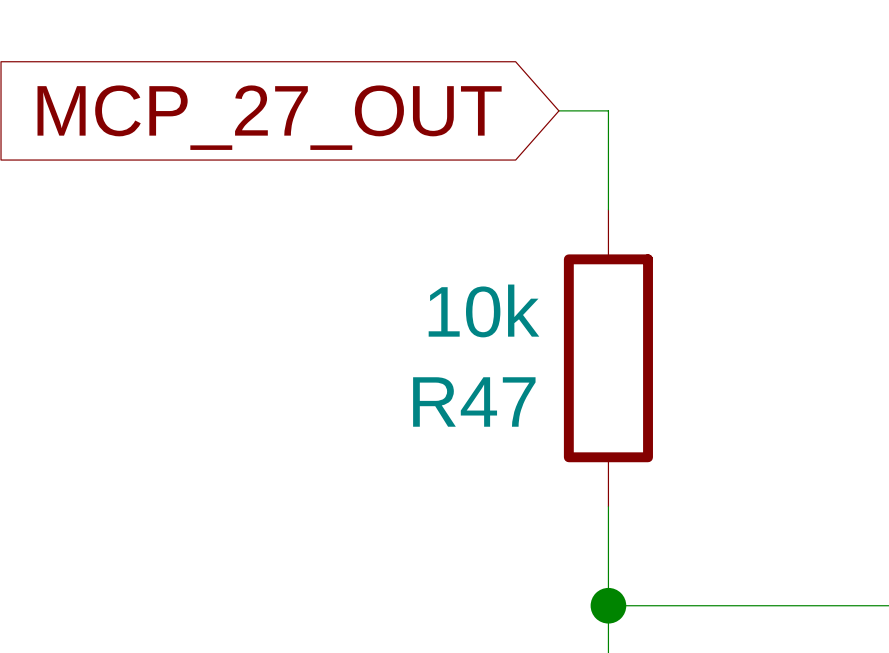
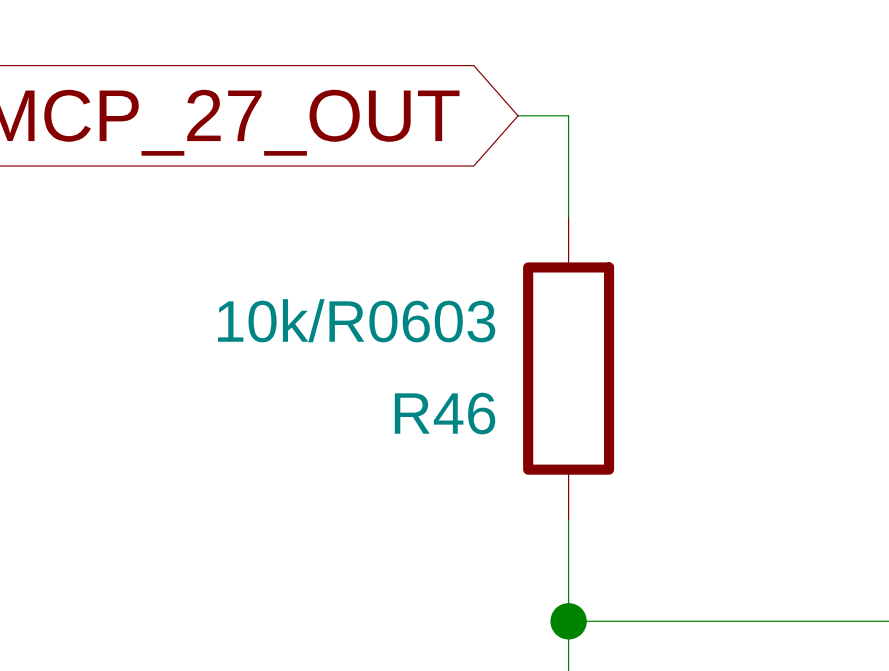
R47 value: 10k (483, 310) -> 10k/R0603 (356, 320)
R47 name: R47 (474, 401) -> R46 (445, 413)

